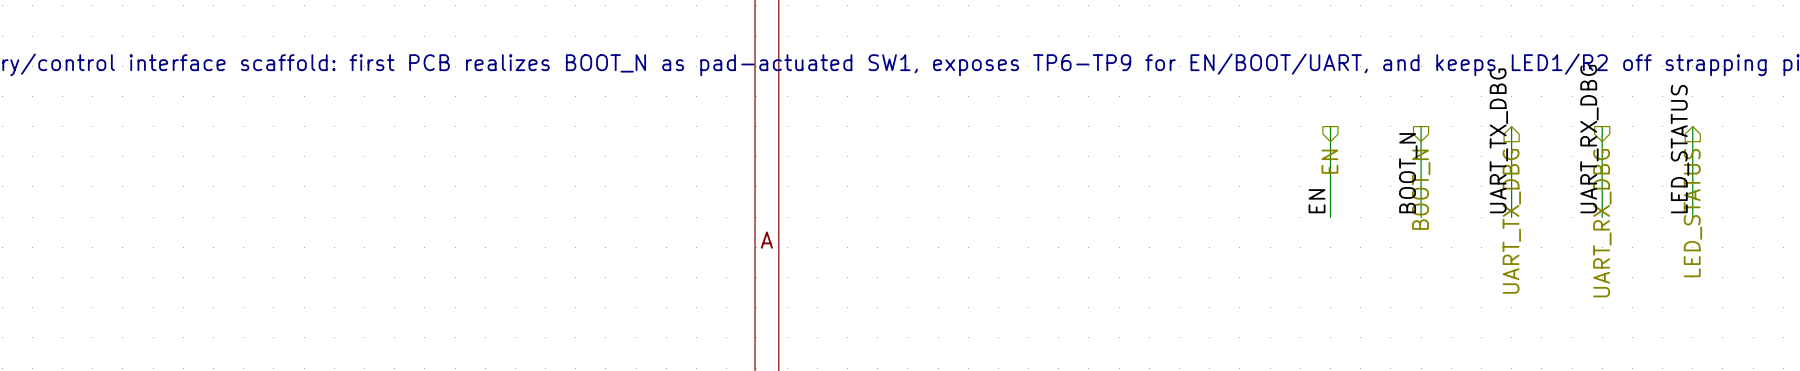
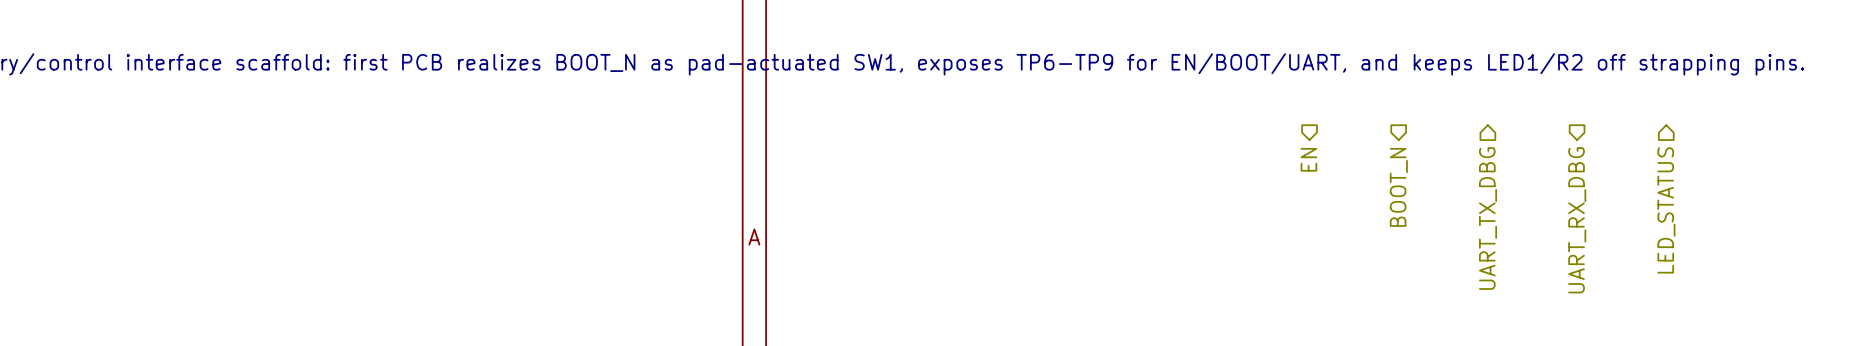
wire: (1330, 126) (1330, 217) -> none
wire: (1421, 126) (1421, 217) -> none
wire: (1511, 126) (1511, 217) -> none
wire: (1602, 126) (1602, 217) -> none
wire: (1692, 126) (1692, 217) -> none
label: UART_RX_DBG (1589, 139) -> none
label: UART_TX_DBG (1498, 140) -> none
label: LED_STATUS (1680, 149) -> none
label: BOOT_N (1408, 173) -> none
label: EN (1317, 201) -> none

